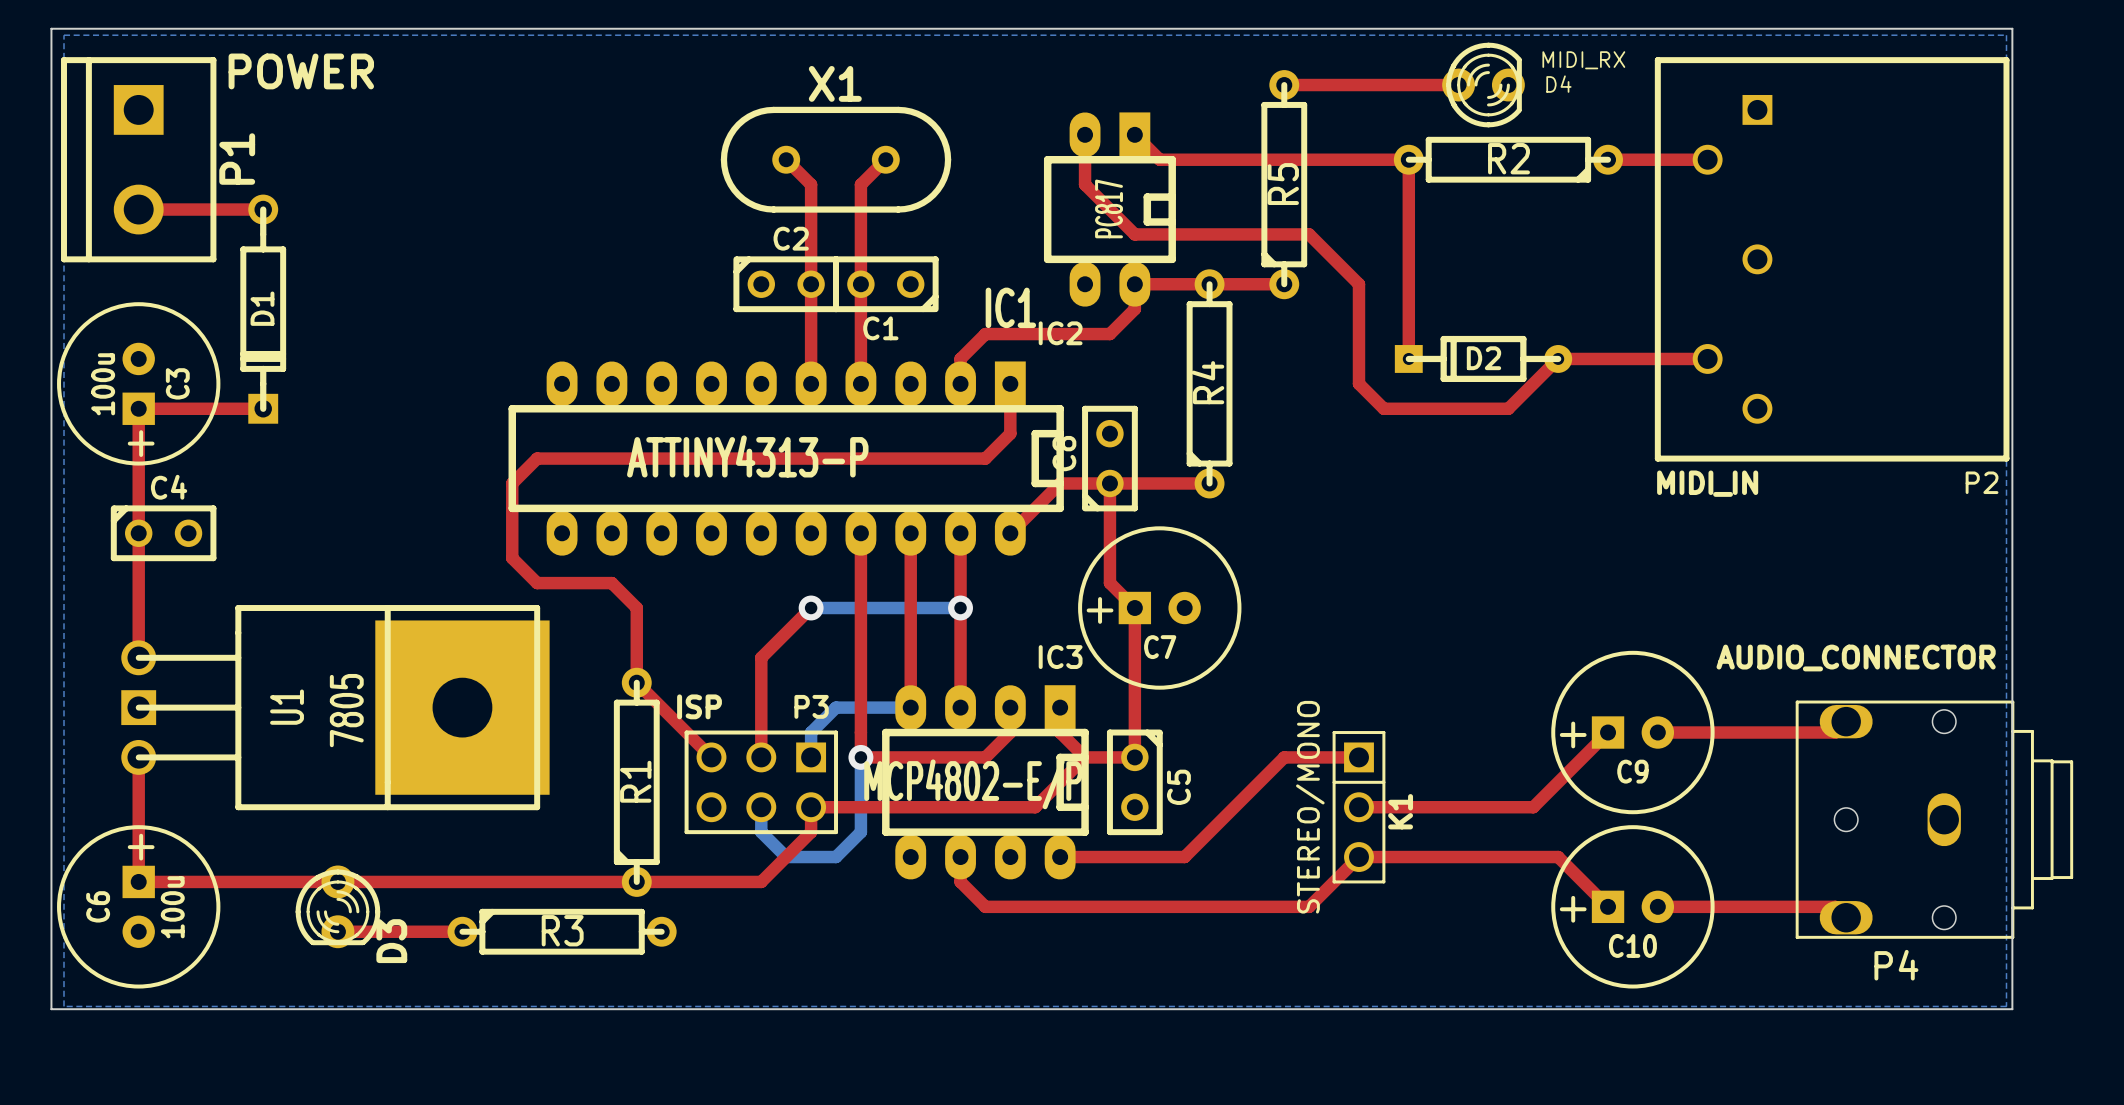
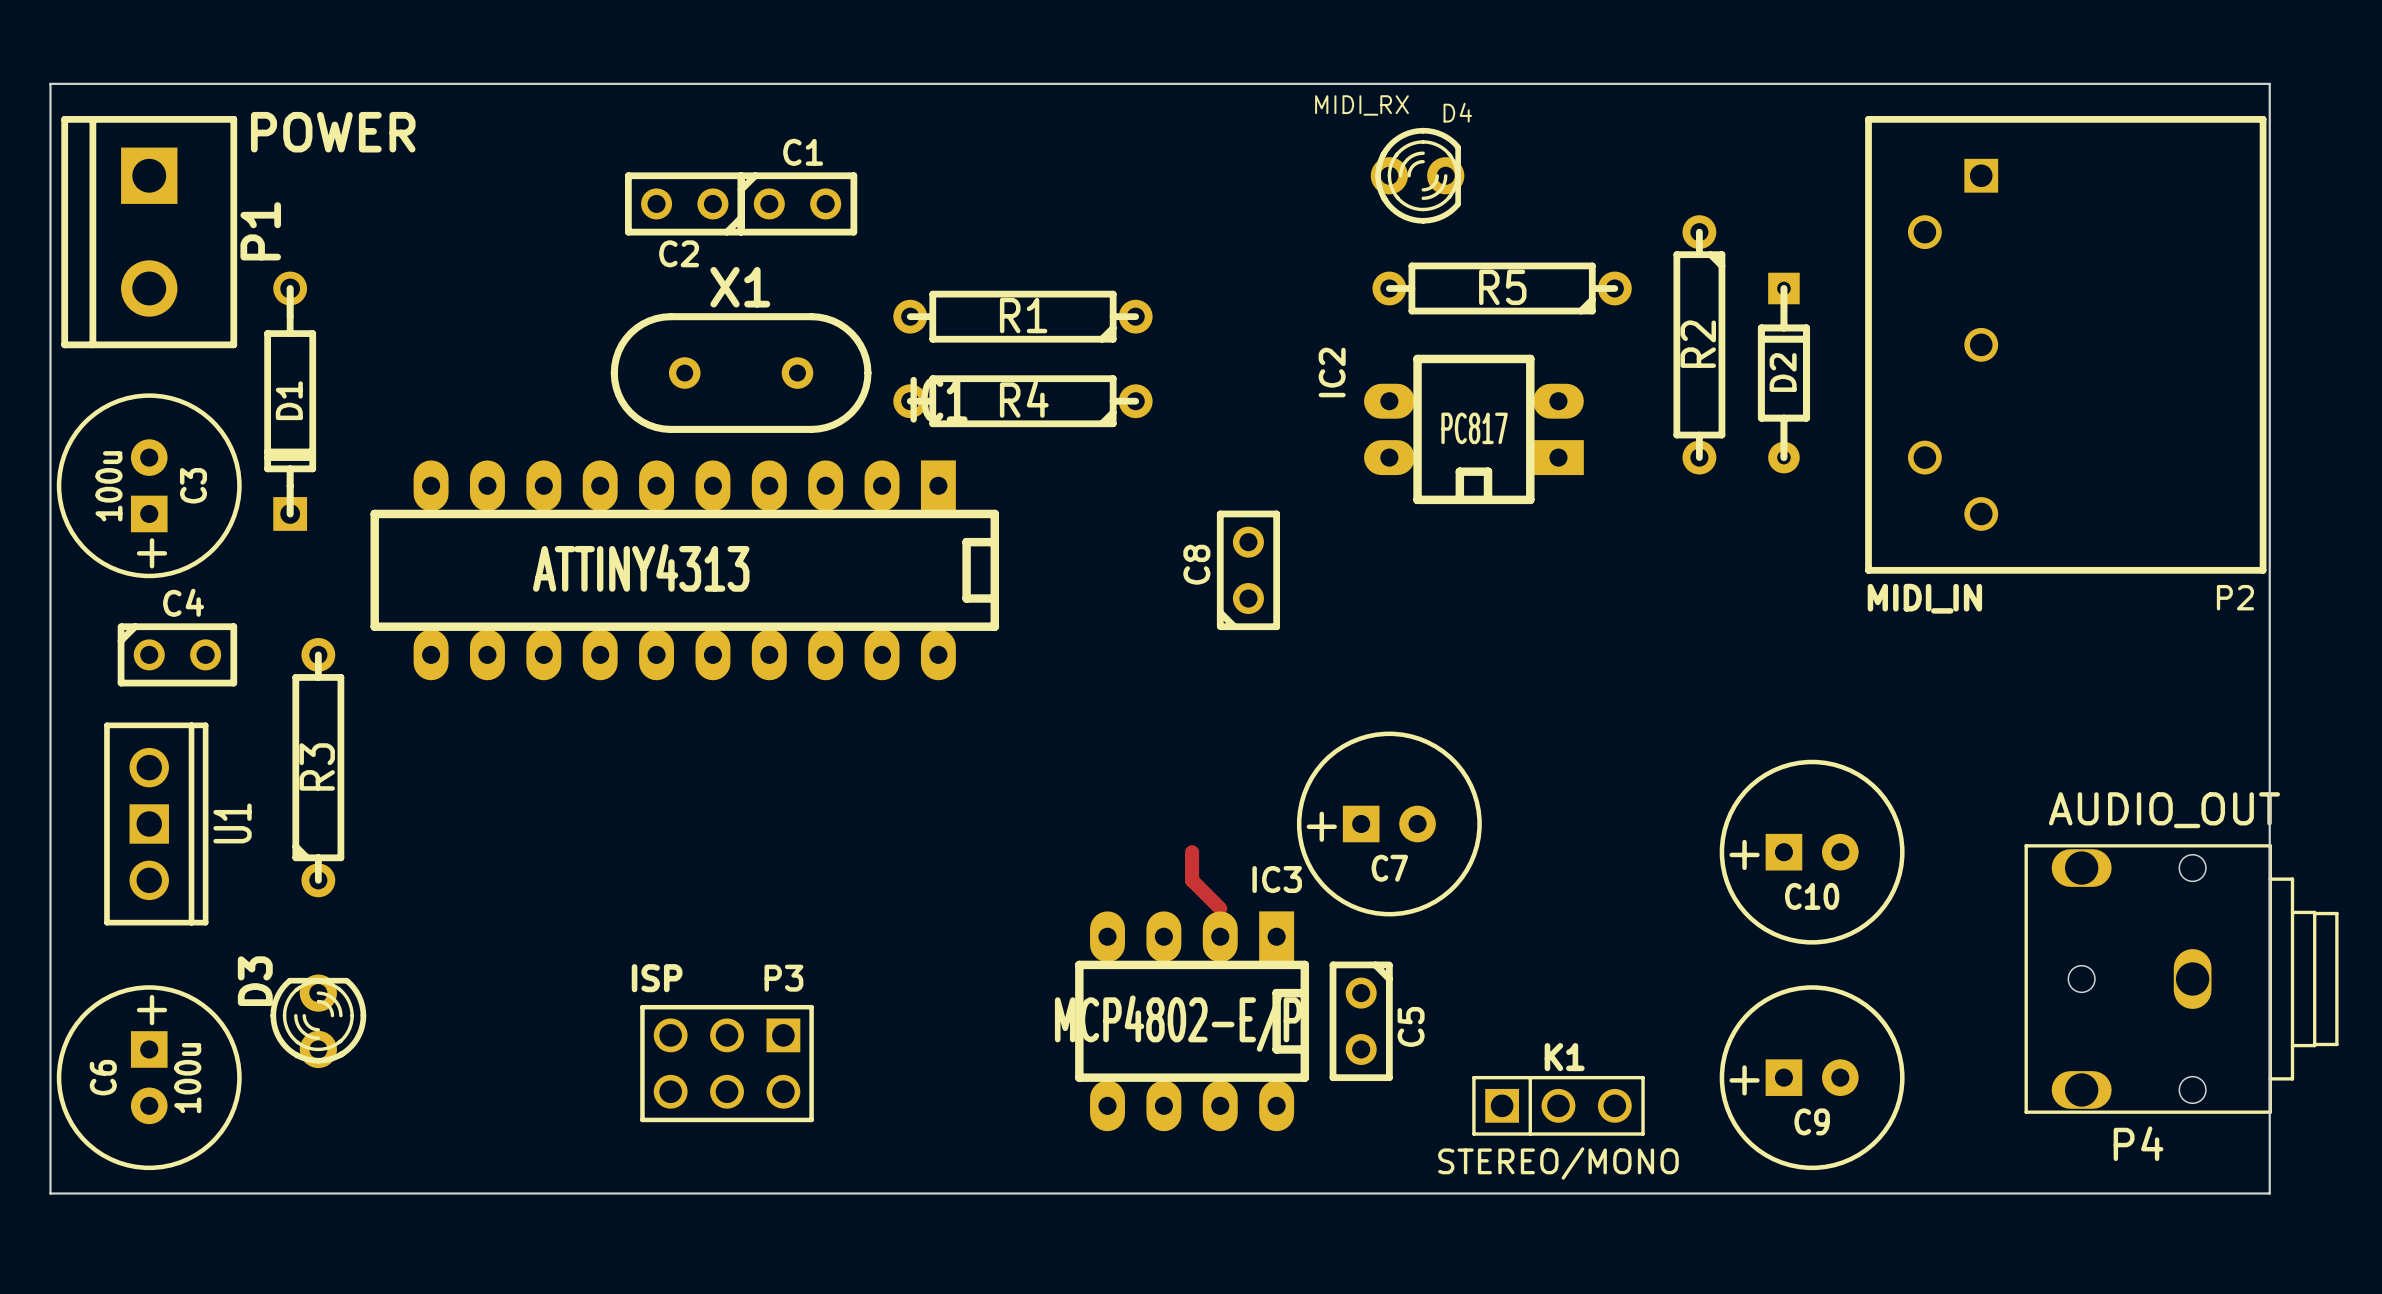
bottom zone outline: (64, 35) (64, 1006) (2006, 1006) (2006, 35) (64, 35) -> none
D4 value position: MIDI_RX (1583, 60) -> MIDI_RX (1361, 105)
D4 name position: D4 (1558, 84) -> D4 (1457, 112)
top track: (1284, 85) (1458, 85) -> none
D4 position: (1483, 85) -> (1417, 175)
top track: (1085, 134) (1085, 184) (1134, 234) (1309, 234) (1358, 284) (1358, 383) (1383, 408) (1508, 408) (1558, 358) (1707, 358) -> none
top track: (1134, 134) (1159, 159) (1408, 159) (1408, 358) -> none
top track: (786, 159) (811, 184) (811, 383) -> none
X1 position: (836, 159) -> (741, 373)
top track: (885, 159) (860, 184) (860, 383) -> none
R2 rotation: 0° (1508, 159) -> 90° counterclockwise (1699, 344)
top track: (1608, 159) (1707, 159) -> none
R5 rotation: 0° (1284, 184) -> 90° counterclockwise (1502, 288)
top track: (138, 209) (263, 209) -> none
IC2 rotation: 0° (1109, 209) -> 90° clockwise (1473, 429)
IC2 position: (1109, 209) -> (1473, 429)
C2 rotation: 0° (786, 284) -> 180° (684, 203)
C2 position: (786, 284) -> (684, 203)
C1 rotation: 0° (885, 284) -> 180° (797, 203)
C1 position: (885, 284) -> (797, 203)
top track: (1284, 284) (1134, 284) (1134, 309) (1109, 334) (985, 334) (960, 358) (960, 383) -> none
D2 rotation: 0° (1483, 358) -> 90° clockwise (1783, 373)
D2 position: (1483, 358) -> (1783, 373)
top track: (1010, 383) (1010, 433) (985, 458) (537, 458) (512, 483) (512, 558) (537, 583) (611, 583) (636, 608) (636, 682) (711, 757) -> none
R4 rotation: 0° (1209, 383) -> 90° counterclockwise (1022, 401)
R4 position: (1209, 383) -> (1022, 401)
top track: (263, 408) (138, 408) (138, 657) -> none
IC1 value: ATTINY4313-P (747, 456) -> ATTINY4313 (641, 567)
IC1 position: (786, 458) -> (684, 570)
top track: (1109, 483) (1109, 583) (1134, 608) (1134, 757) (1085, 757) (1035, 807) (811, 807) (811, 832) (761, 881) (138, 881) (138, 757) -> none
top track: (1209, 483) (1060, 483) (1010, 533) -> none
top track: (860, 533) (860, 757) (985, 757) (1010, 732) (1010, 707) -> none
top track: (910, 533) (910, 707) -> none
top track: (960, 533) (960, 707) -> none
U1 footprint: [121, 605, 550, 811] -> [104, 722, 209, 926]
top track: (811, 608) (761, 657) (761, 757) -> none
bottom track: (811, 608) (960, 608) -> none
via: (811, 608) -> none
via: (960, 608) -> none
C7 position: (1159, 608) -> (1389, 823)
P4 value: AUDIO_CONNECTOR (1856, 658) -> AUDIO_OUT (2164, 810)
U1 name position: U1 (287, 707) -> U1 (232, 823)
bottom track: (910, 707) (836, 707) (811, 732) (811, 757) -> none
U1 value: 7805 (346, 710) -> none
top track: (1846, 721) (1835, 732) (1657, 732) -> none
top track: (1608, 732) (1533, 807) (1358, 807) -> none
C9 position: (1632, 732) -> (1812, 1077)
bottom track: (860, 757) (860, 832) (836, 857) (786, 857) (761, 832) (761, 807) -> none
via: (860, 757) -> none
top track: (1358, 757) (1284, 757) (1184, 857) (1060, 857) -> none
R1 rotation: 0° (636, 782) -> 90° counterclockwise (1022, 316)
R1 position: (636, 782) -> (1022, 316)
P3 position: (761, 782) -> (727, 1063)
IC3 position: (985, 782) -> (1192, 1021)
C5 position: (1134, 782) -> (1361, 1021)
K1 rotation: 0° (1358, 807) -> 90° counterclockwise (1558, 1105)
K1 position: (1358, 807) -> (1558, 1105)
top track: (960, 857) (960, 881) (985, 906) (1309, 906) (1358, 857) (1558, 857) (1608, 906) -> none
D3 rotation: 0° (337, 906) -> 180° (318, 1021)
D3 position: (337, 906) -> (318, 1021)
C10 position: (1632, 906) -> (1812, 852)
top track: (1657, 906) (1835, 906) (1846, 917) -> none
top track: (337, 931) (462, 931) -> none
R3 rotation: 0° (562, 931) -> 90° counterclockwise (318, 767)
R3 position: (562, 931) -> (318, 767)

